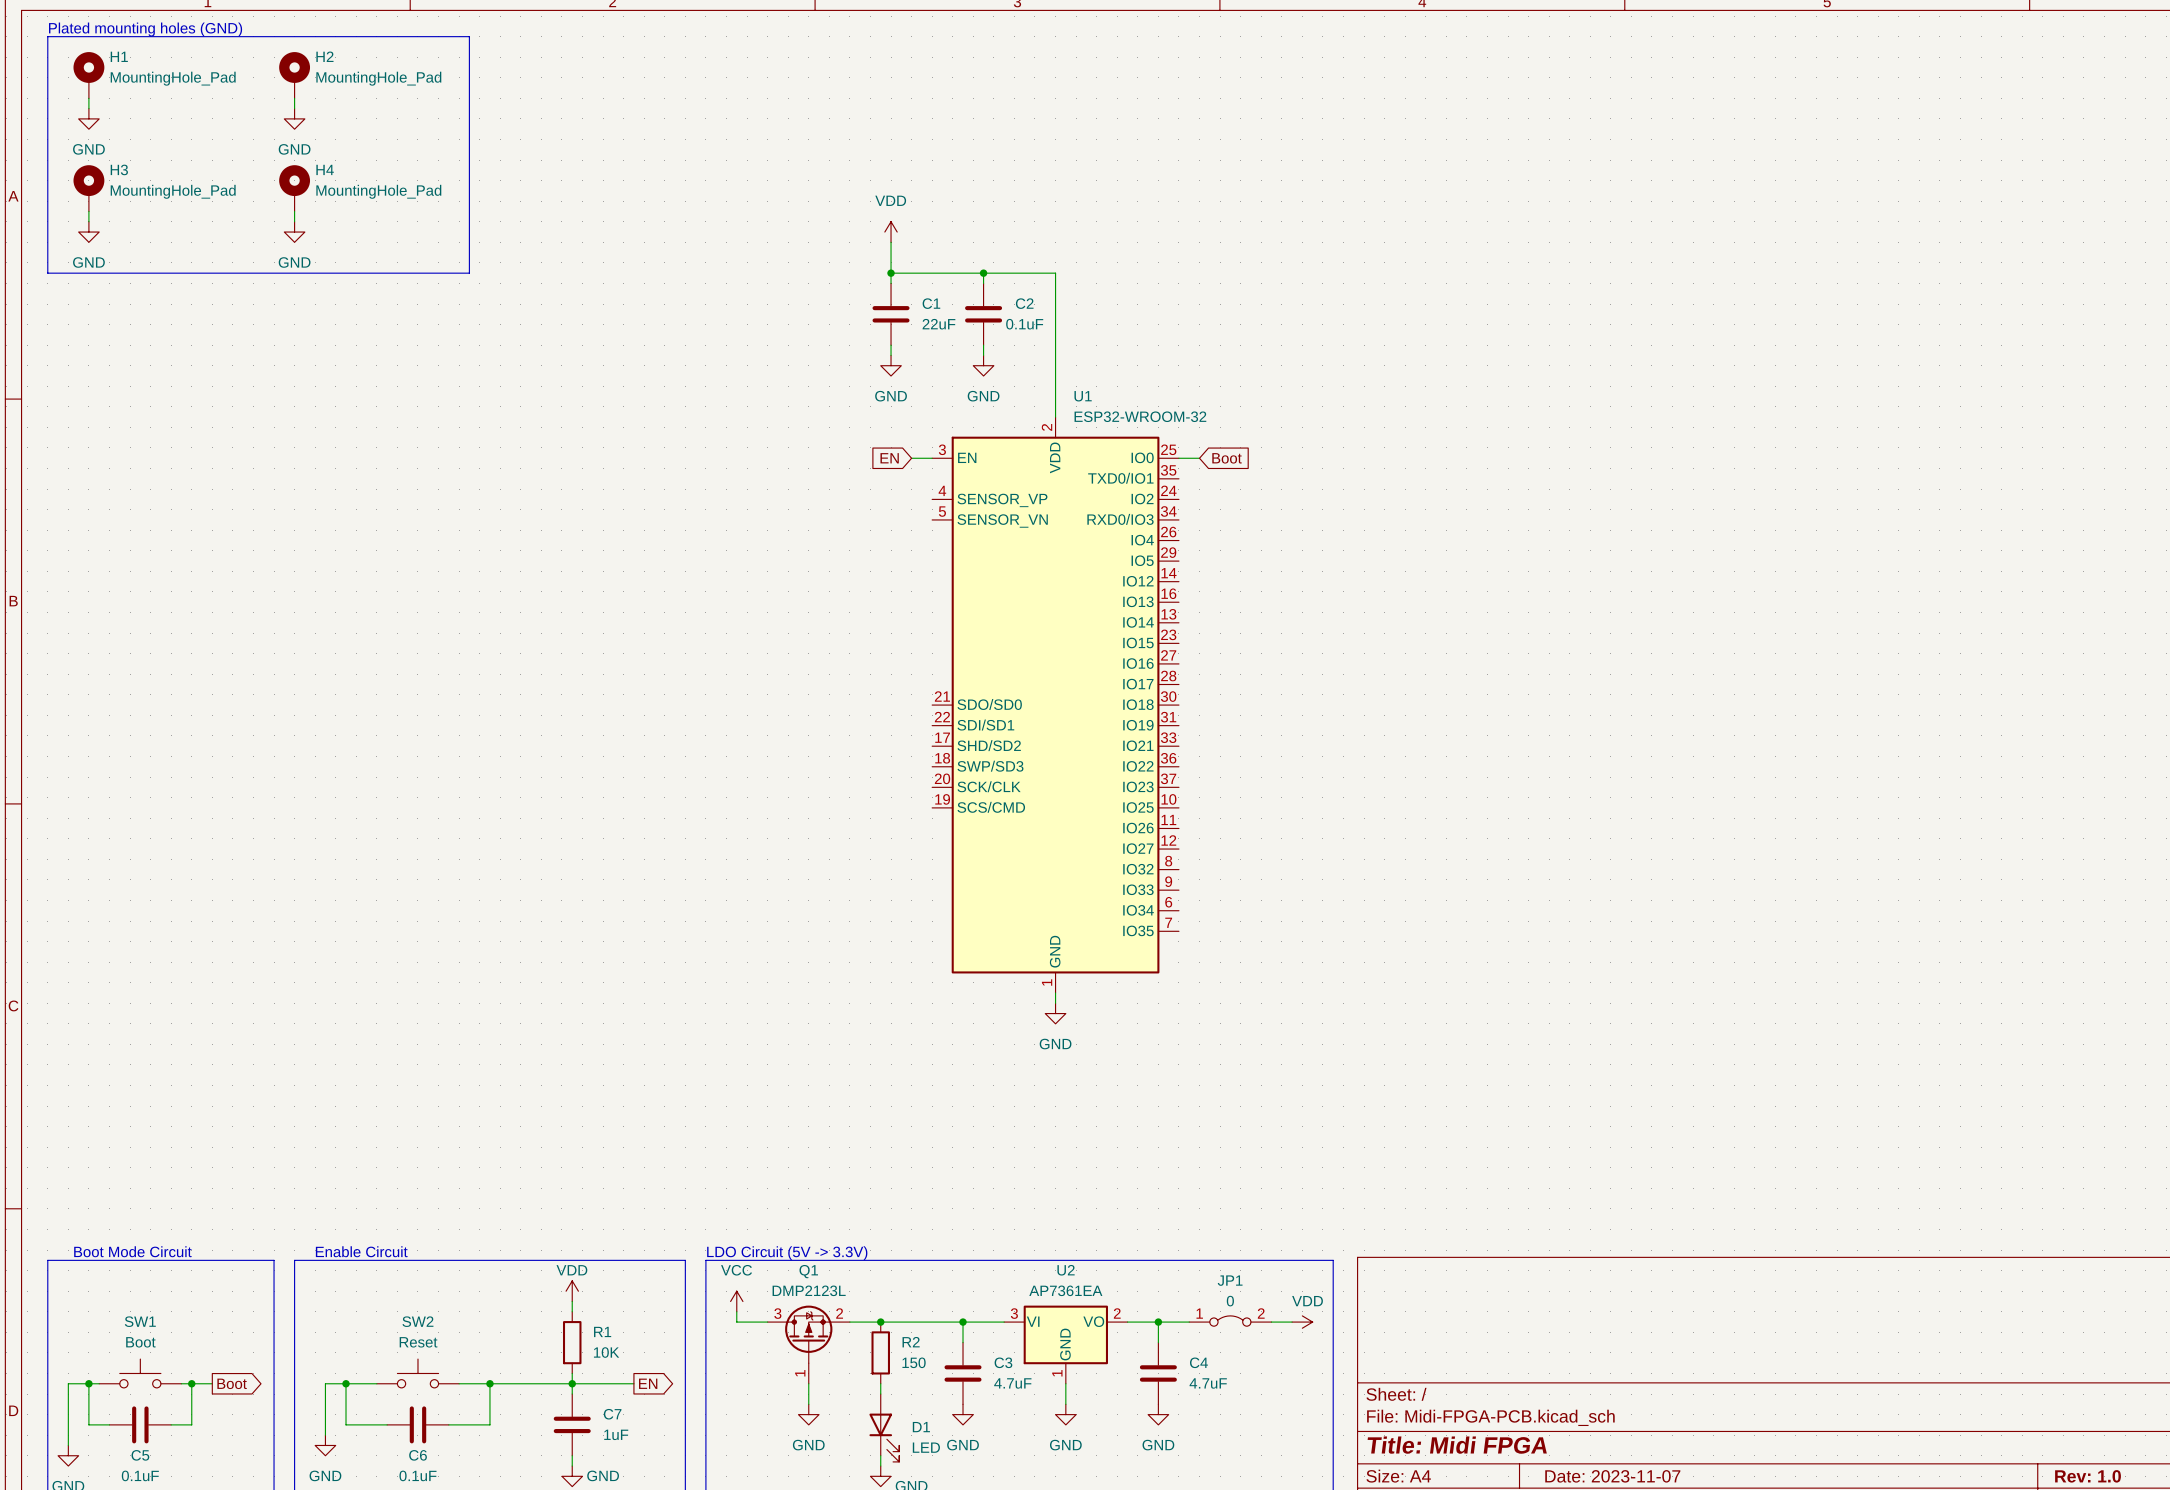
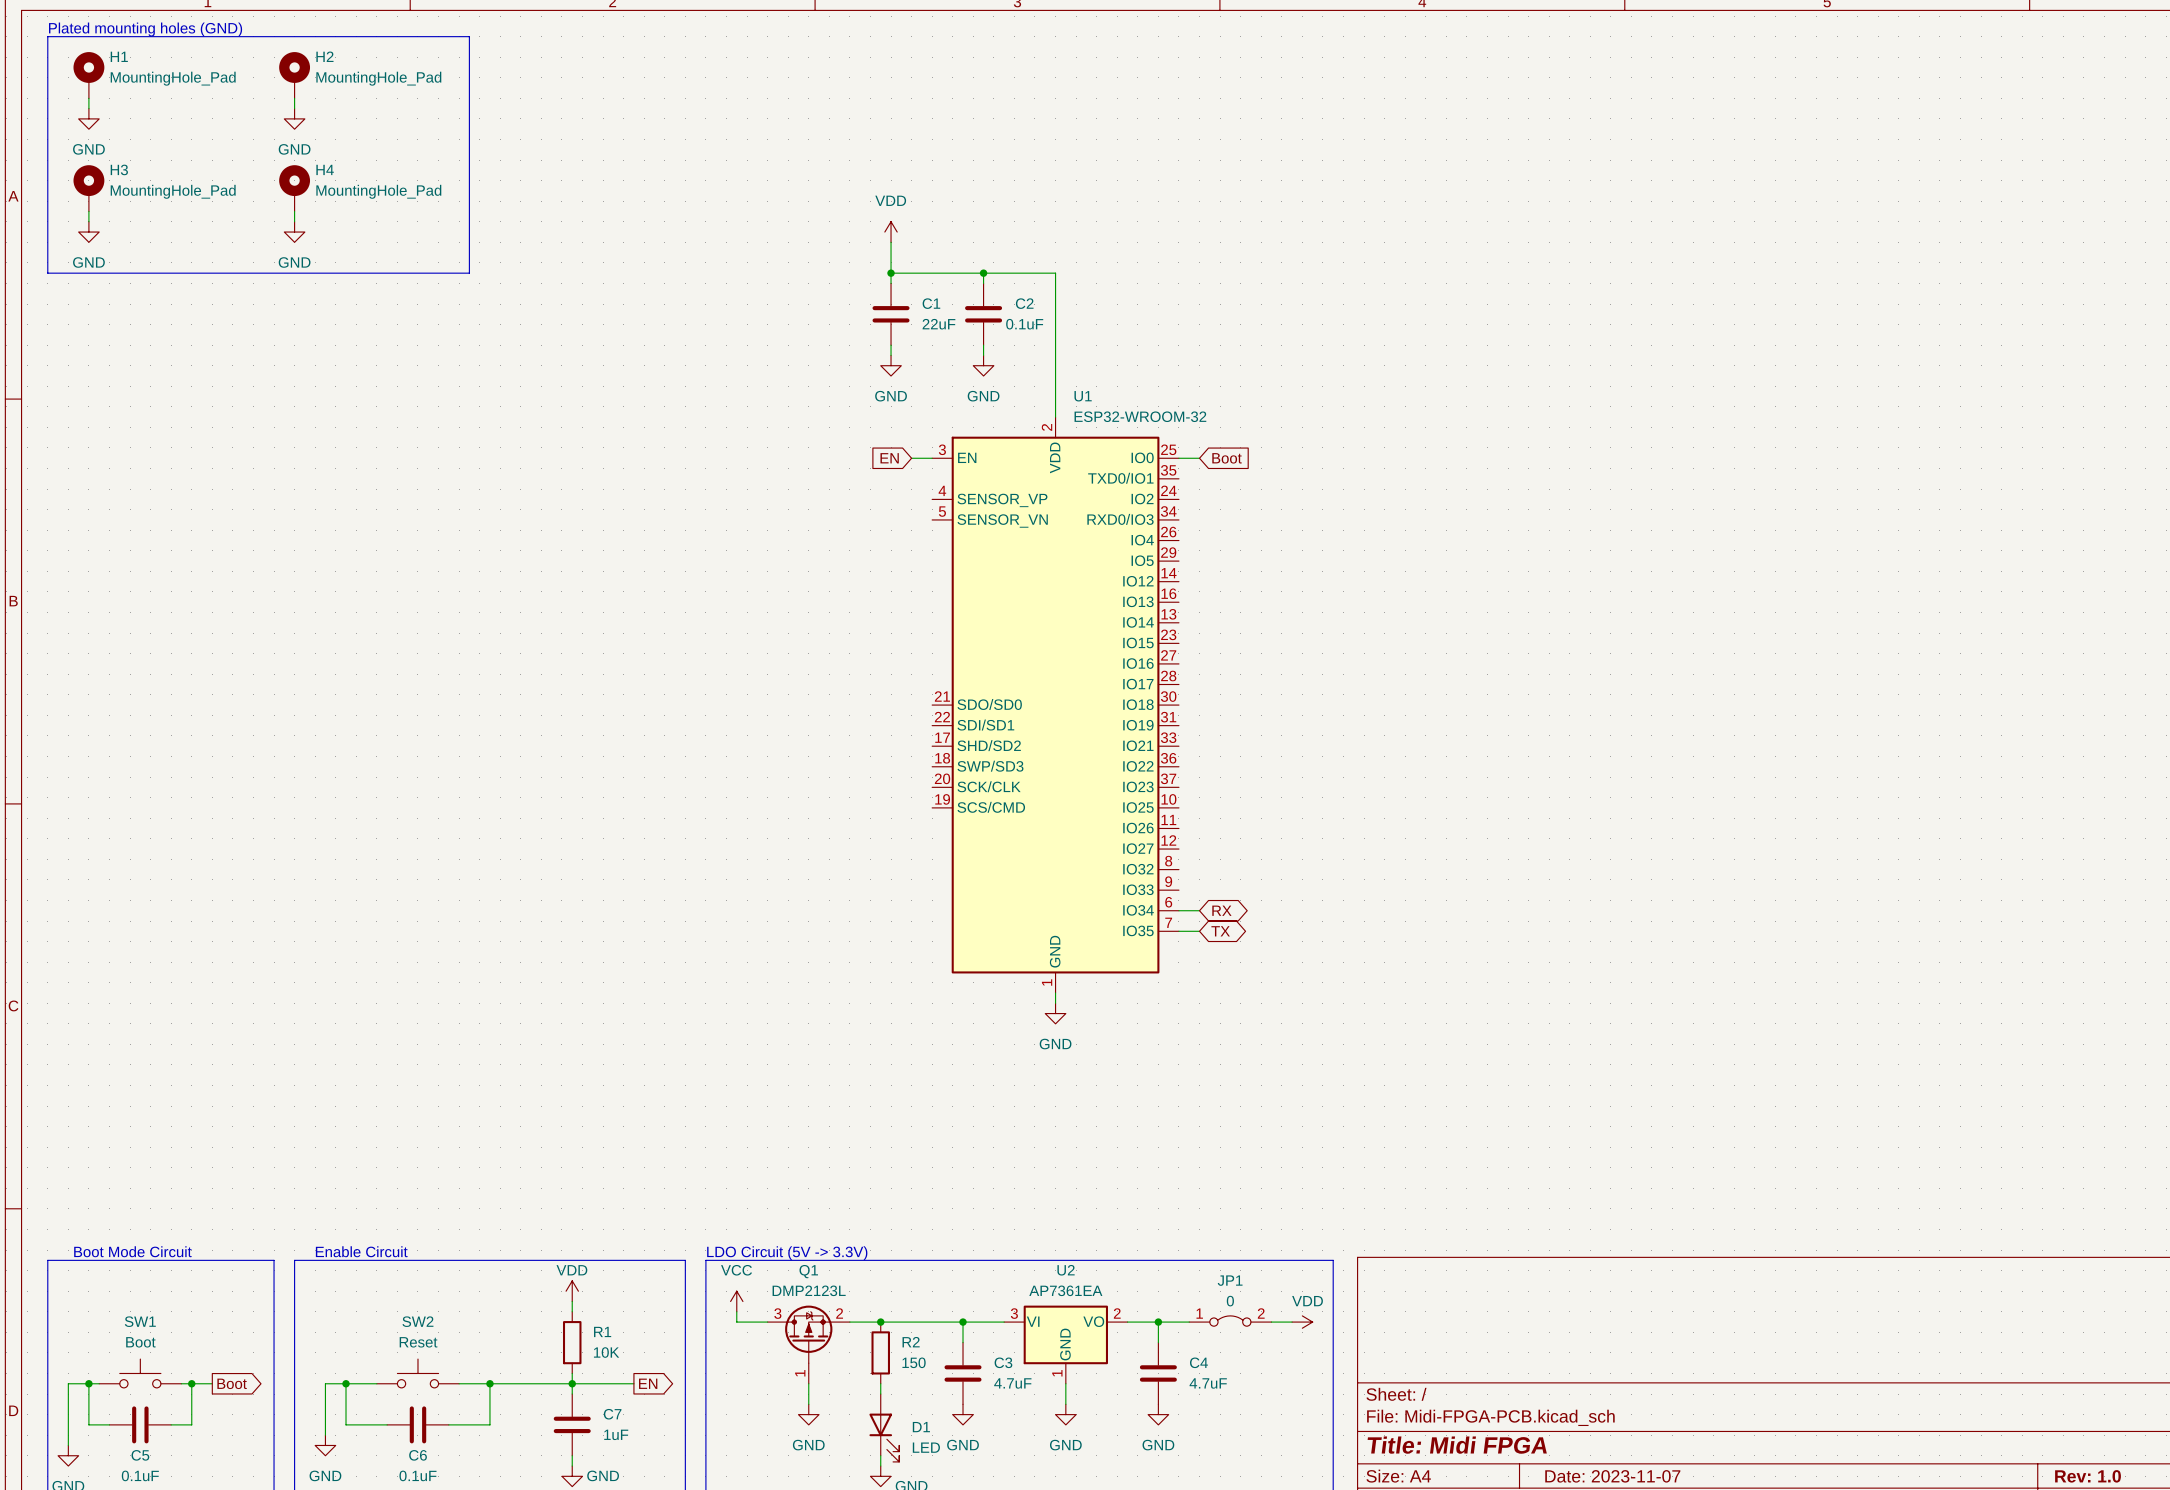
wire: none -> (1178, 910) (1199, 910)
global label: none -> RX (1221, 910)
wire: none -> (1178, 931) (1199, 931)
global label: none -> TX (1220, 931)

